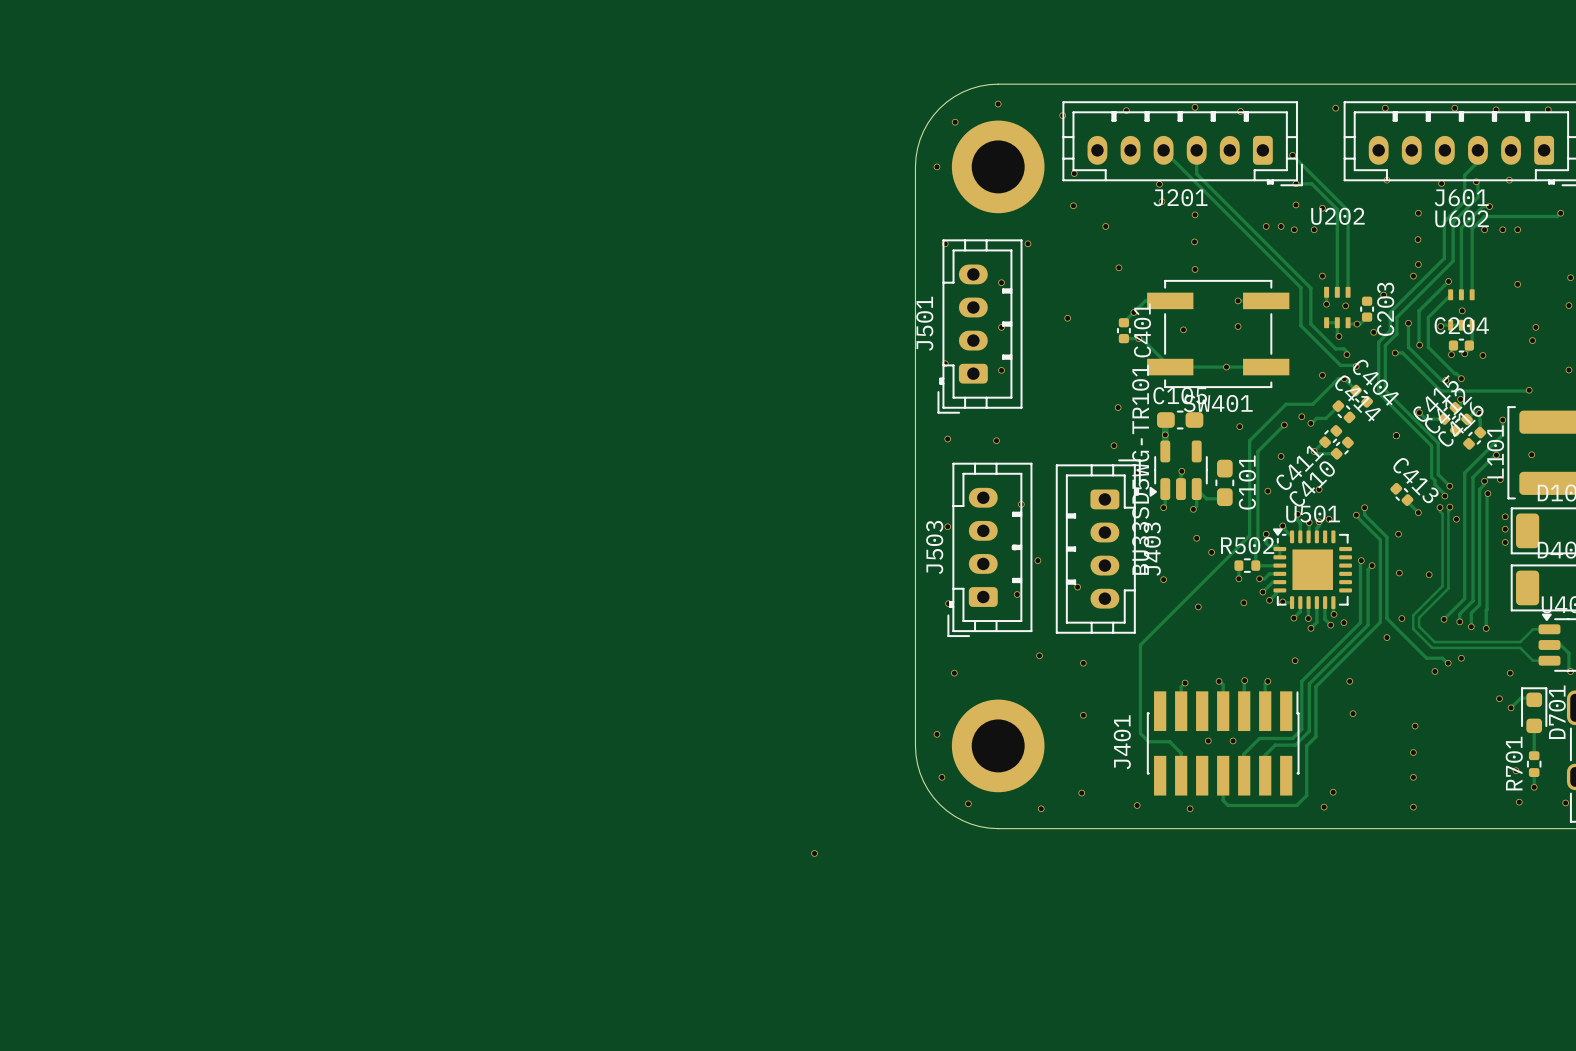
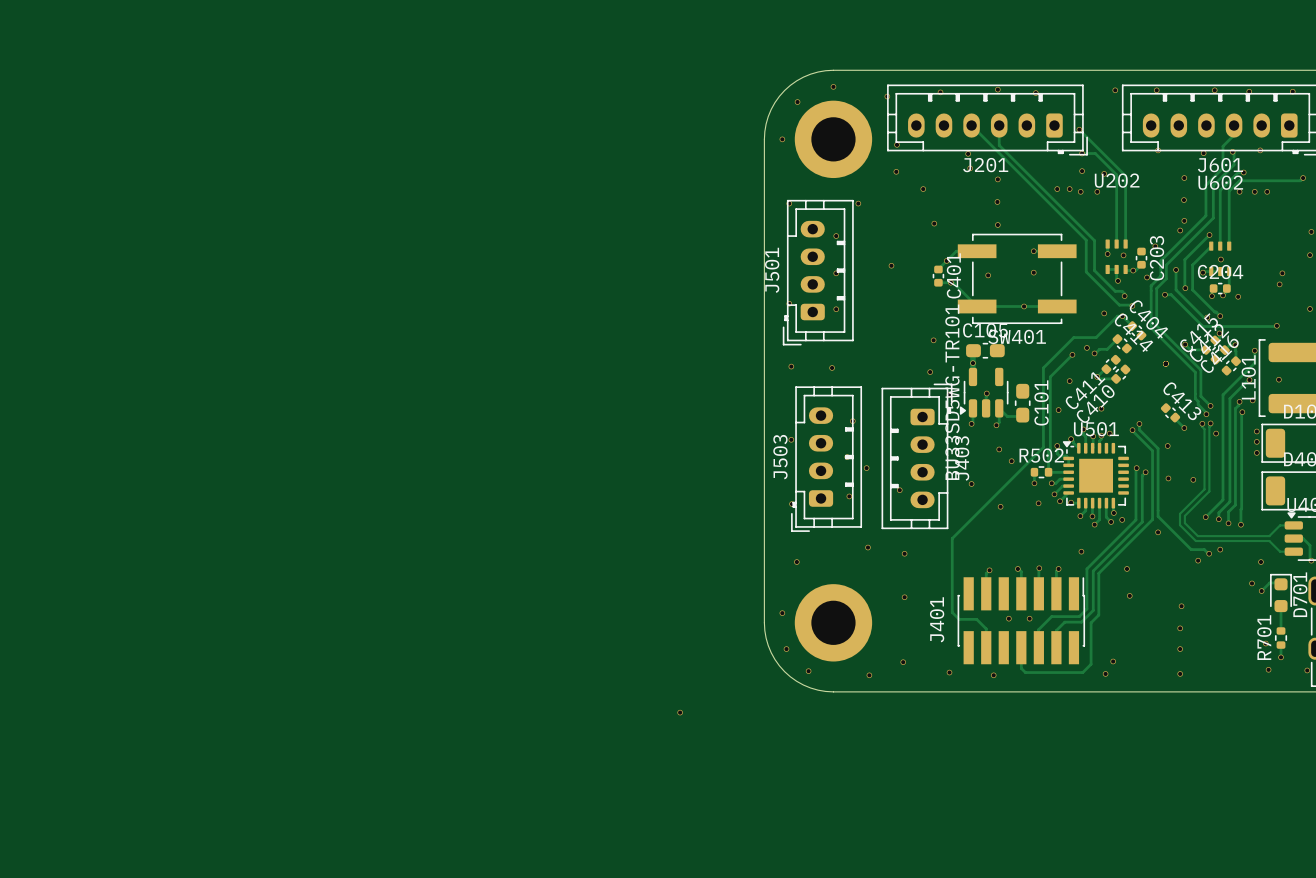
via: (1322, 276) -> none
via: (1517, 284) -> none
via: (1239, 426) -> none
via: (1401, 618) -> none

